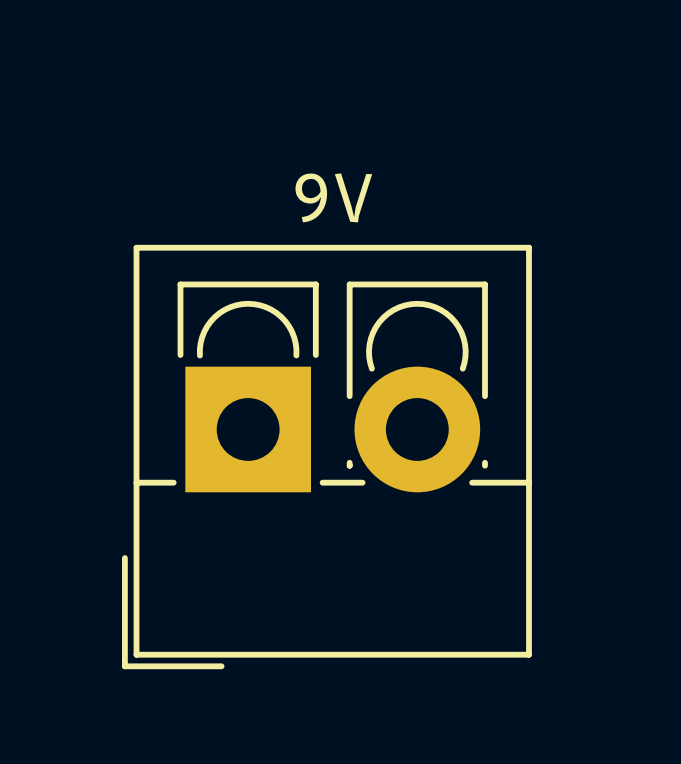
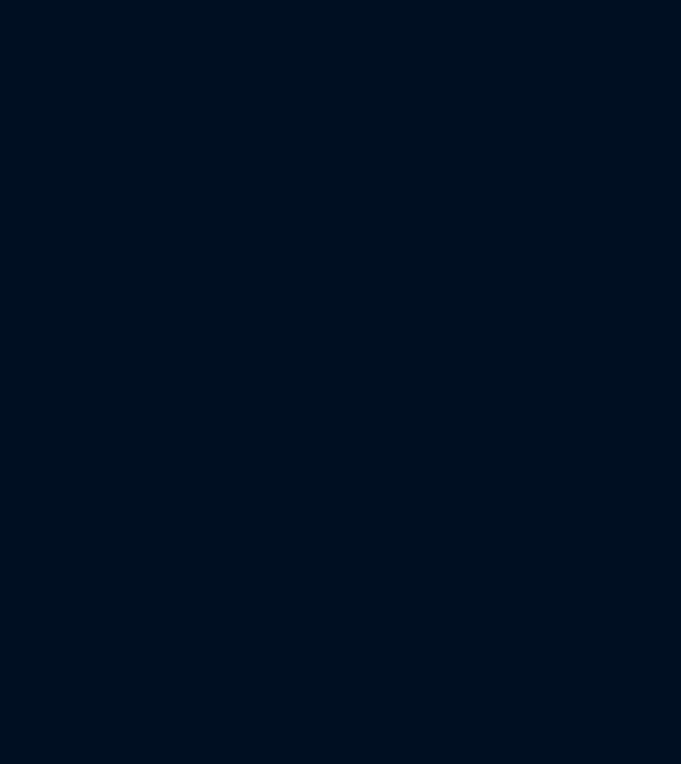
9V: (326, 457) -> none

